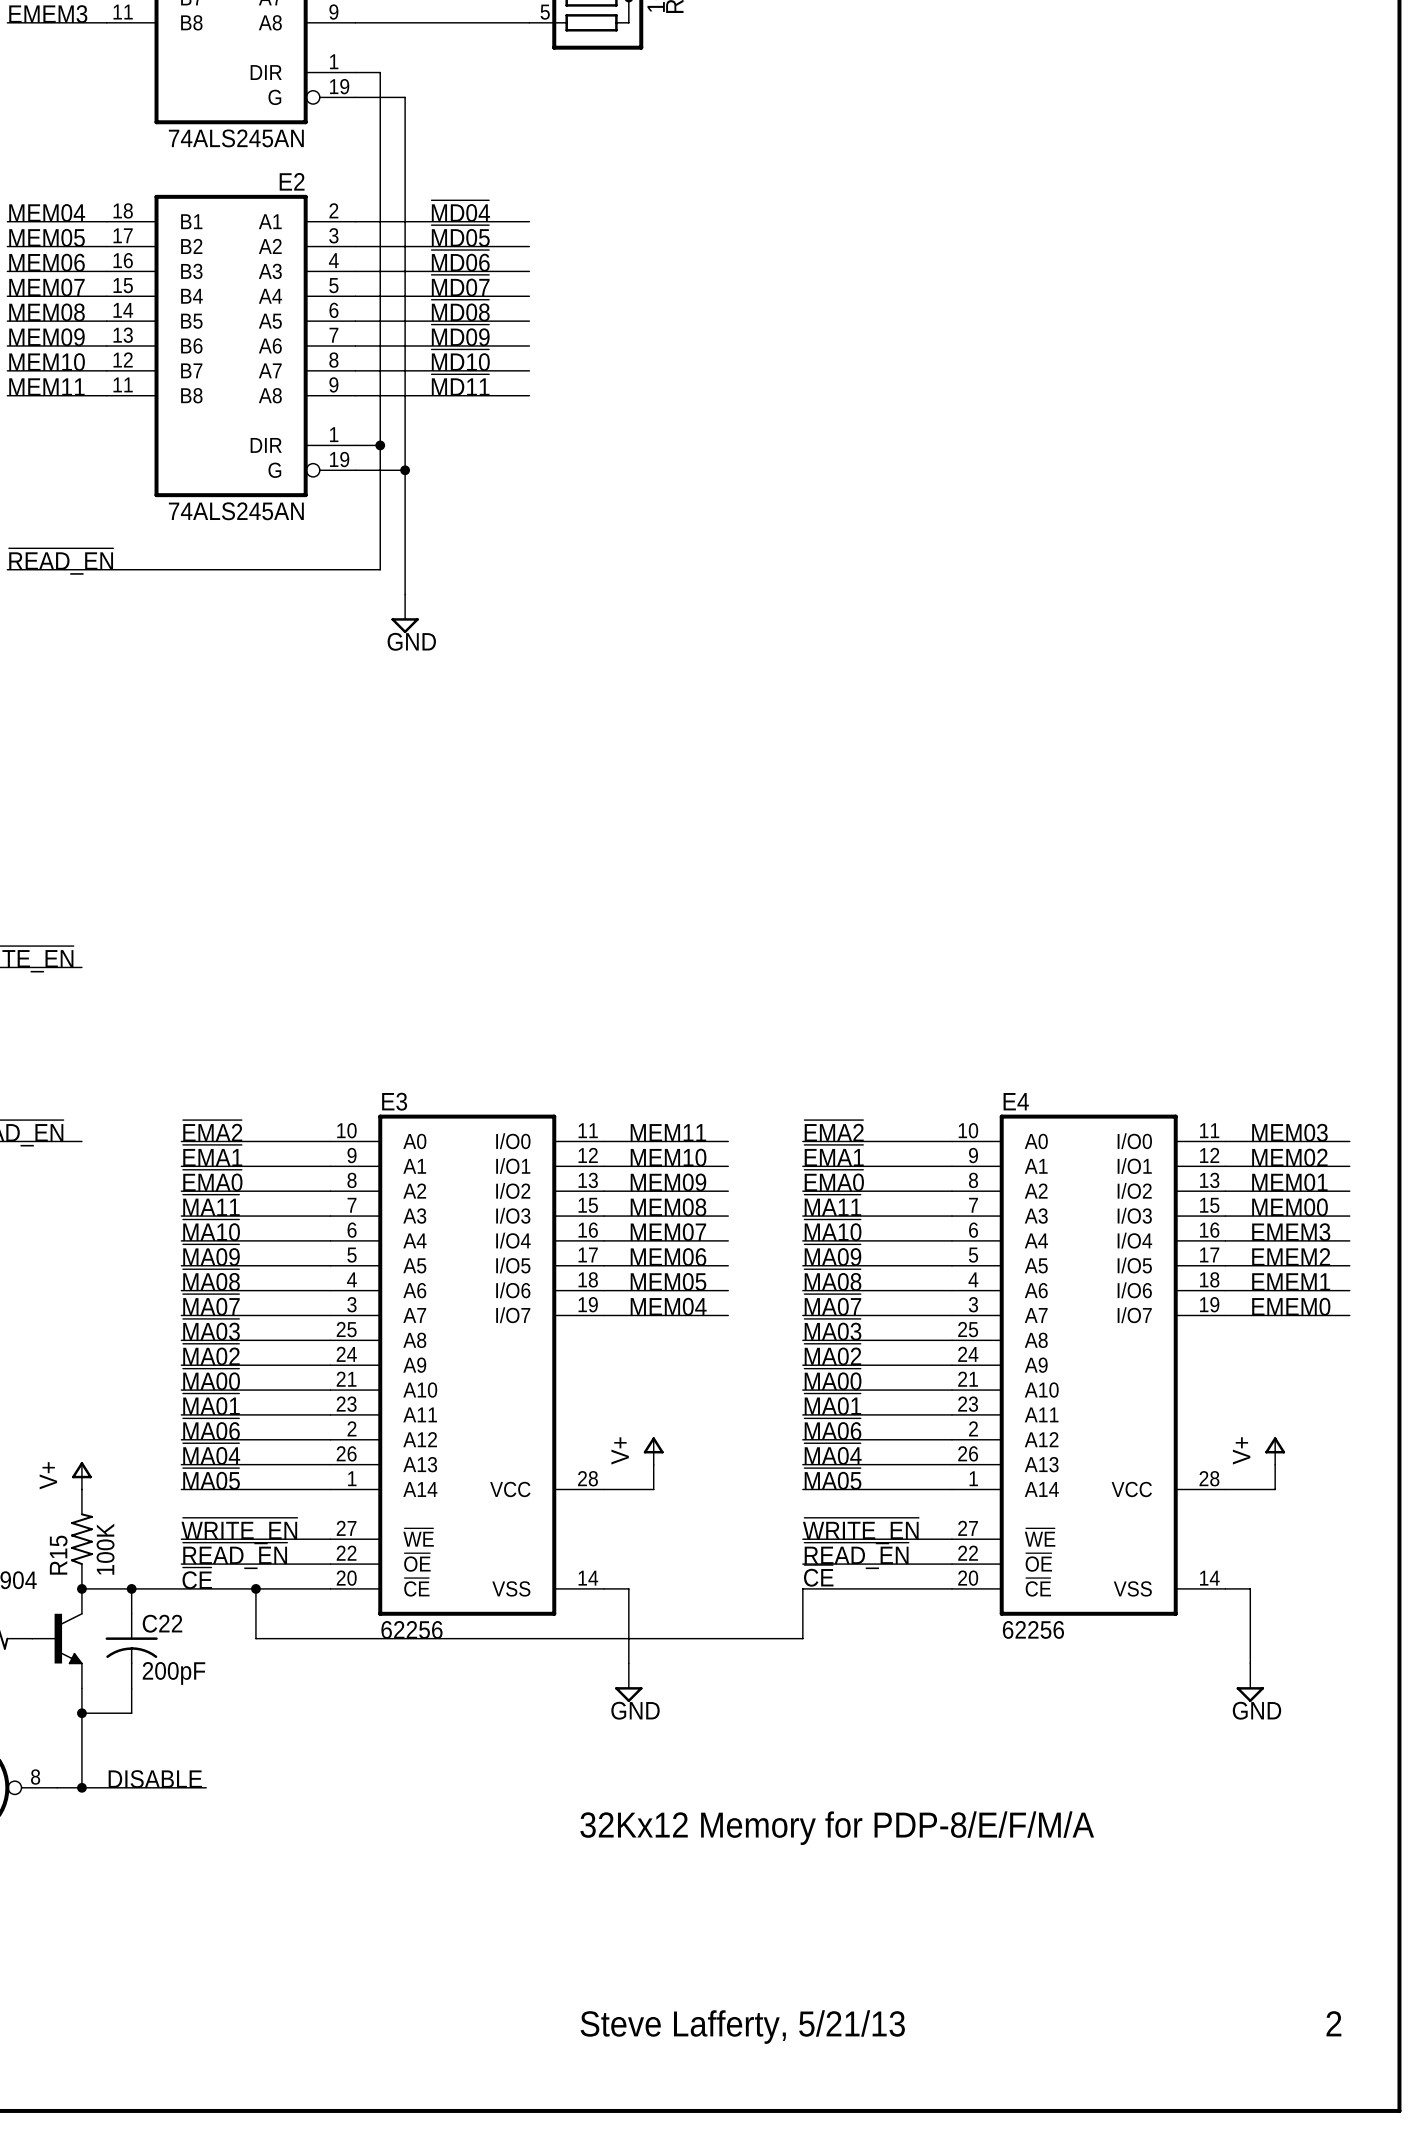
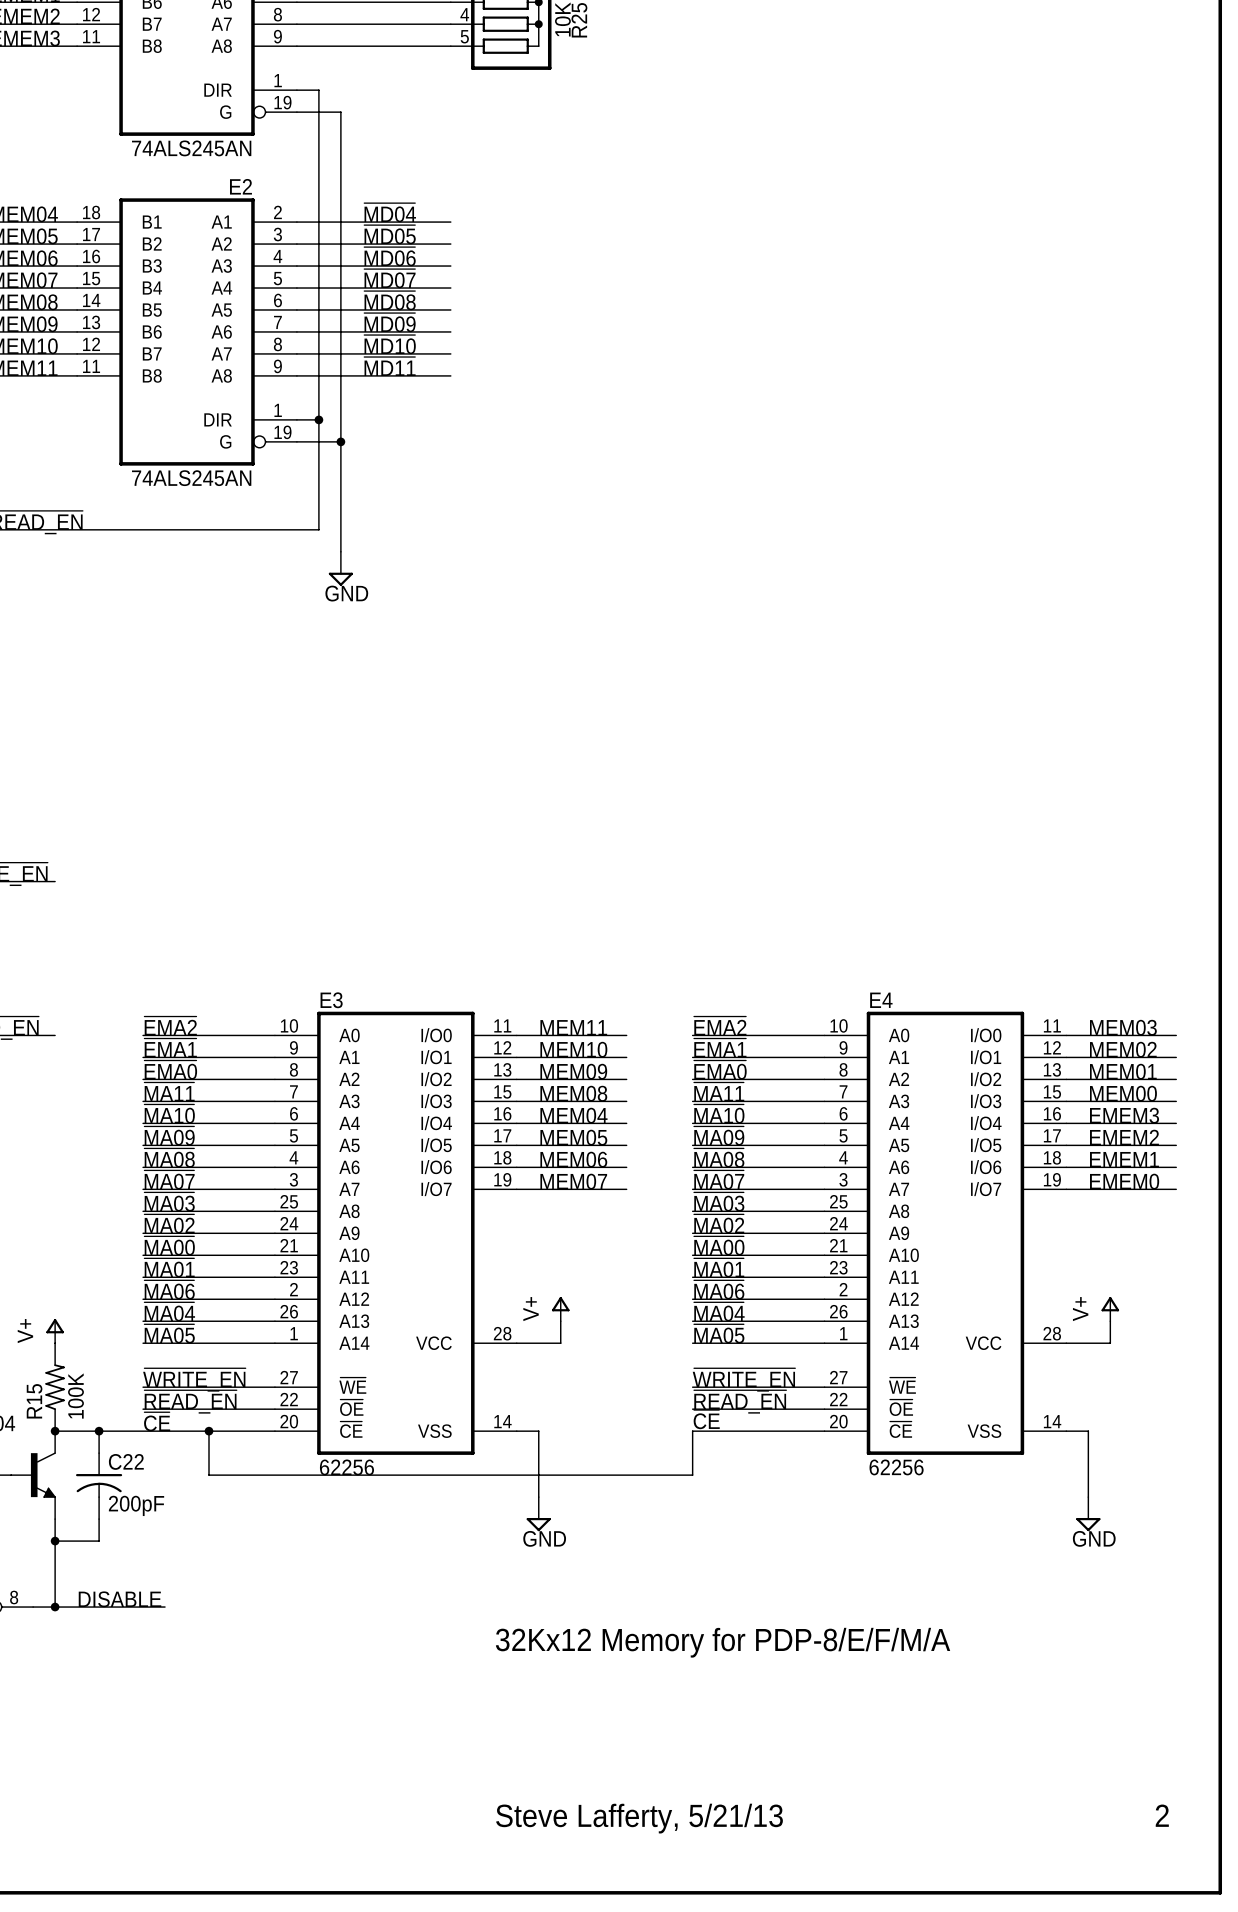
label: MEM07 (668, 1232) -> MEM04 (573, 1115)
label: MEM06 (668, 1257) -> MEM05 (573, 1137)
label: MEM05 (668, 1281) -> MEM06 (573, 1159)
label: MEM04 (668, 1306) -> MEM07 (573, 1181)

